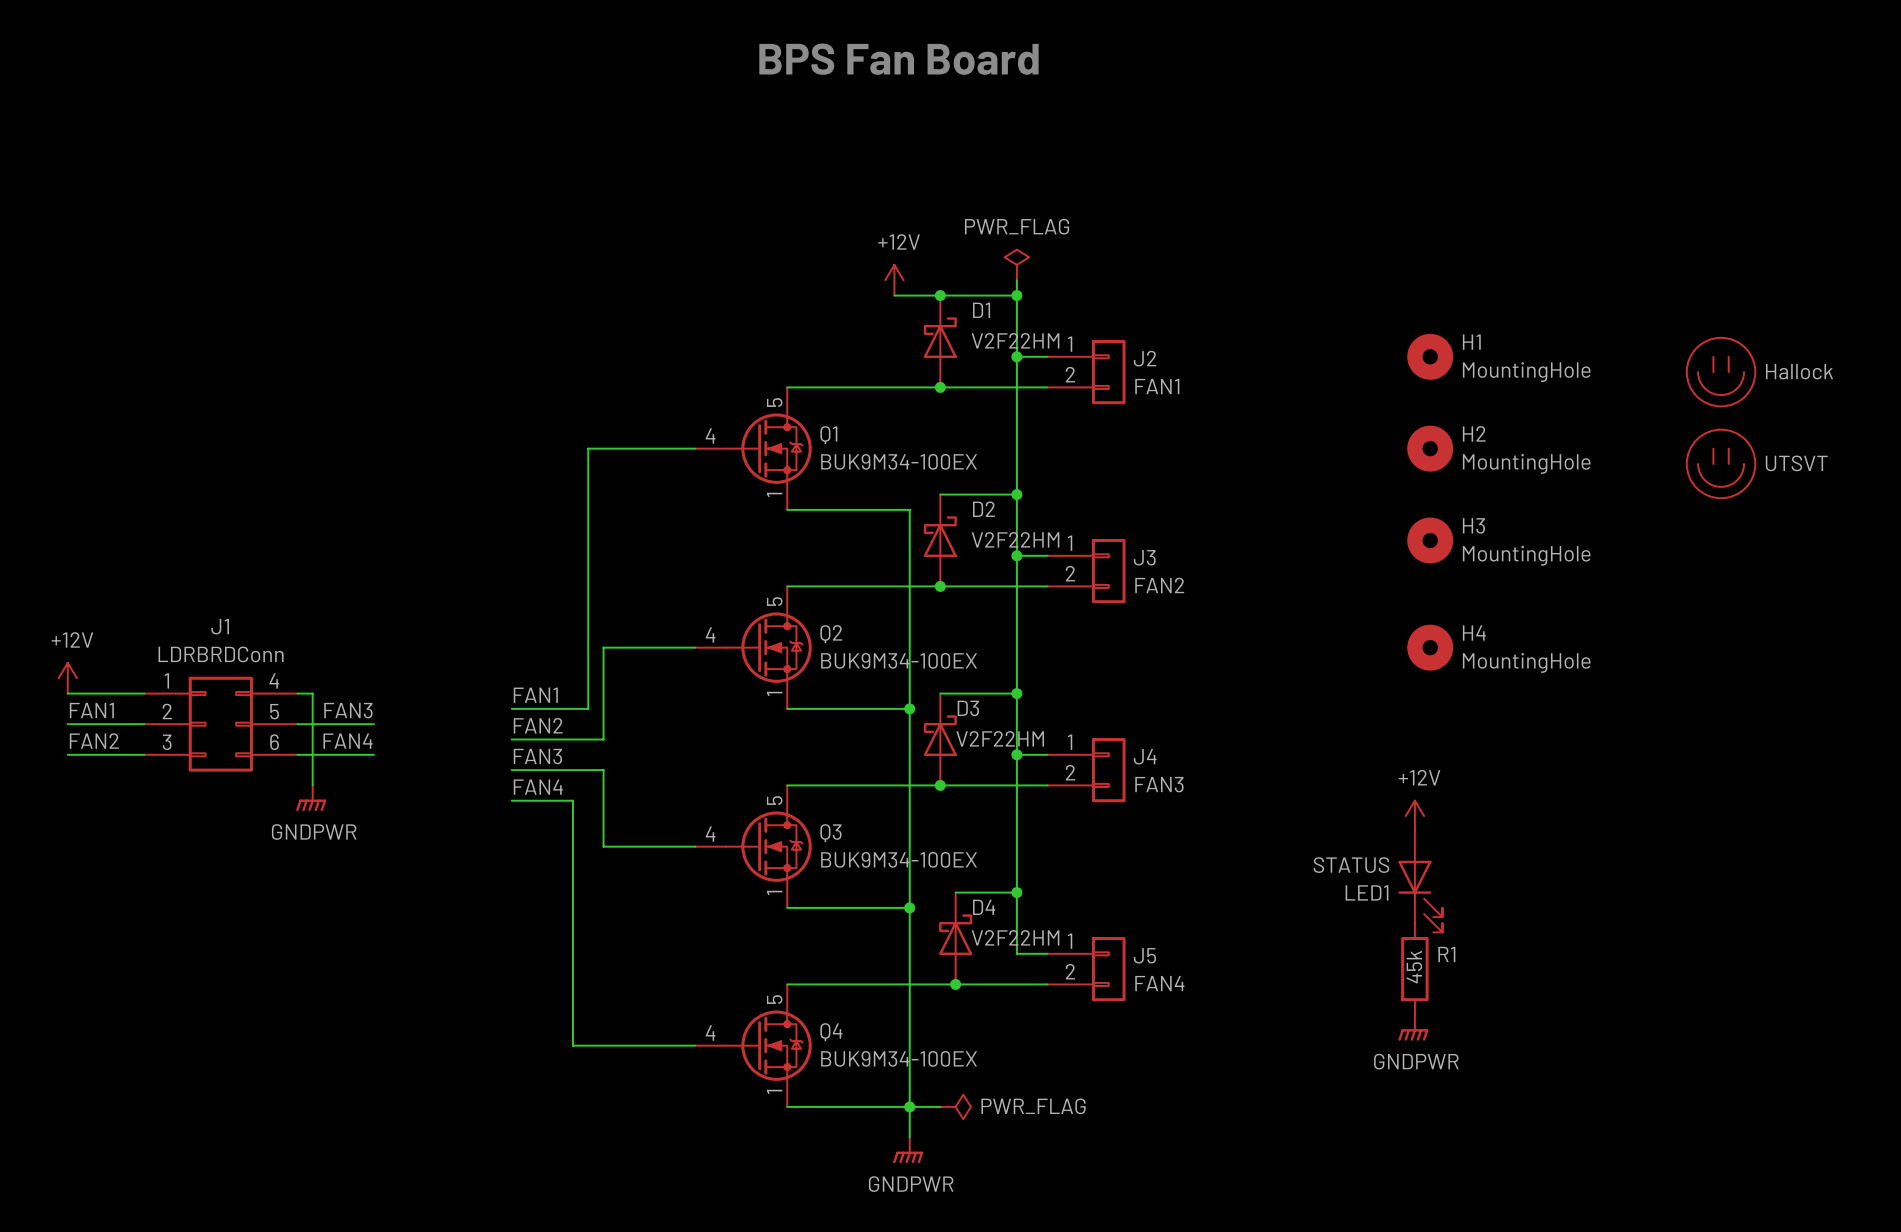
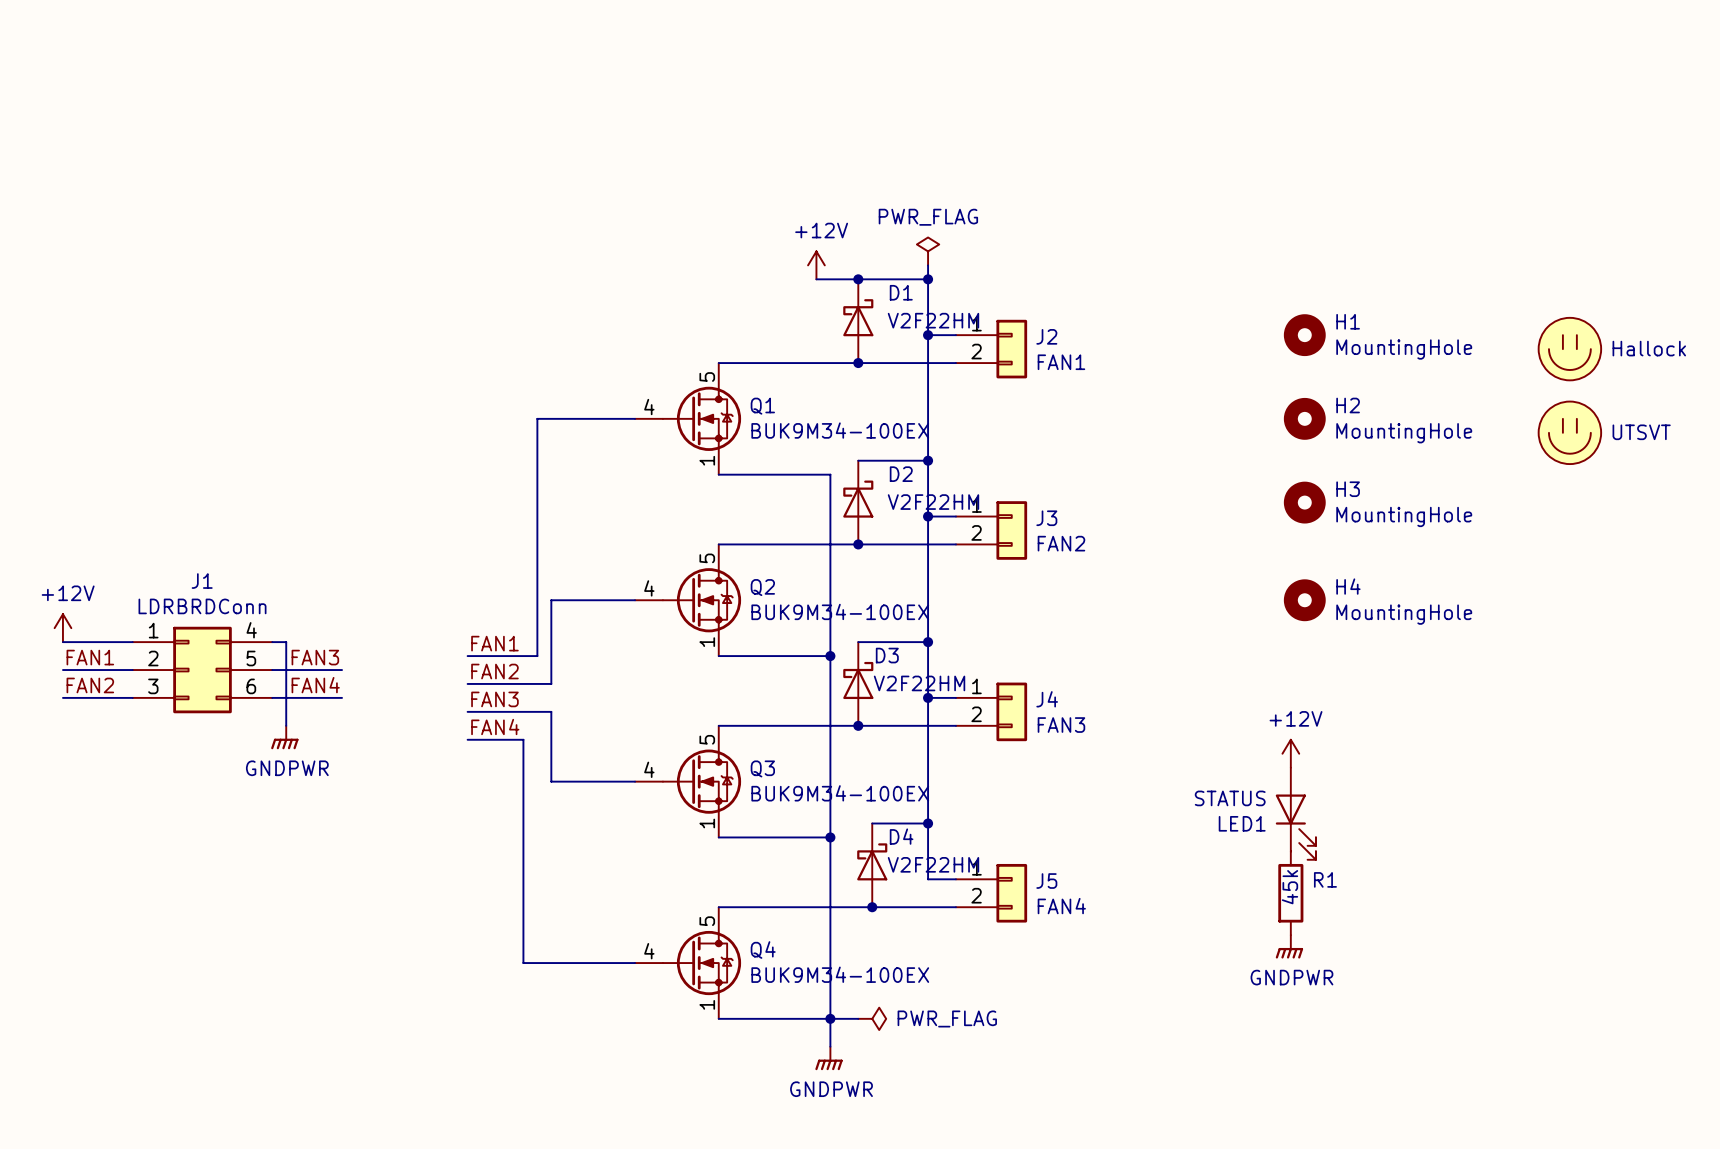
text: BPS Fan Board (898, 59) -> none

